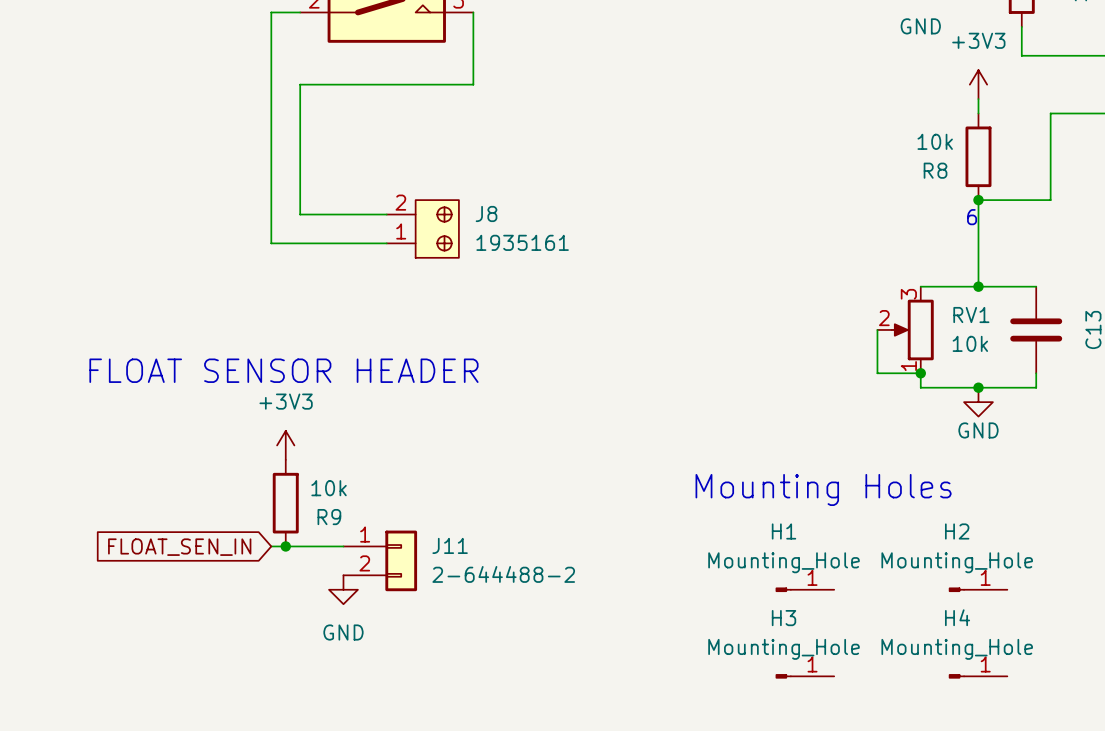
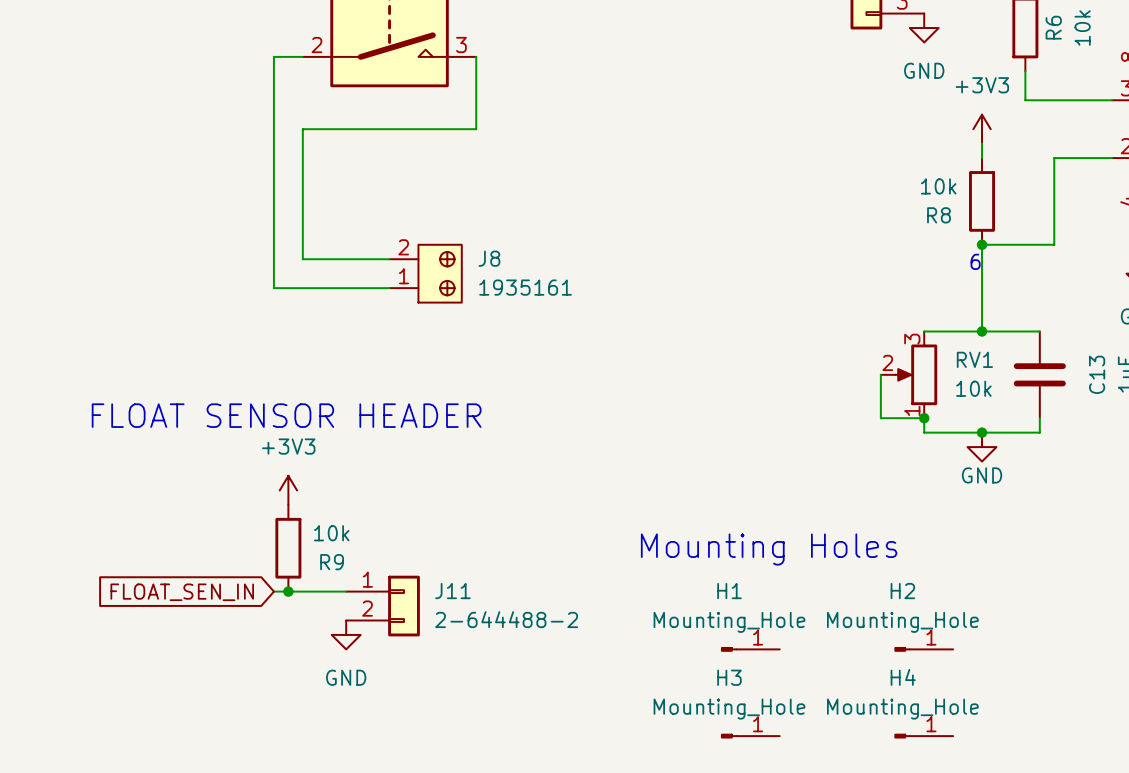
text position: Mounting Holes (823, 489) -> Mounting Holes (769, 549)
H1 position: (804, 589) -> (750, 649)
H2 position: (978, 589) -> (923, 649)
H3 position: (804, 676) -> (750, 736)
H4 position: (978, 676) -> (923, 736)

